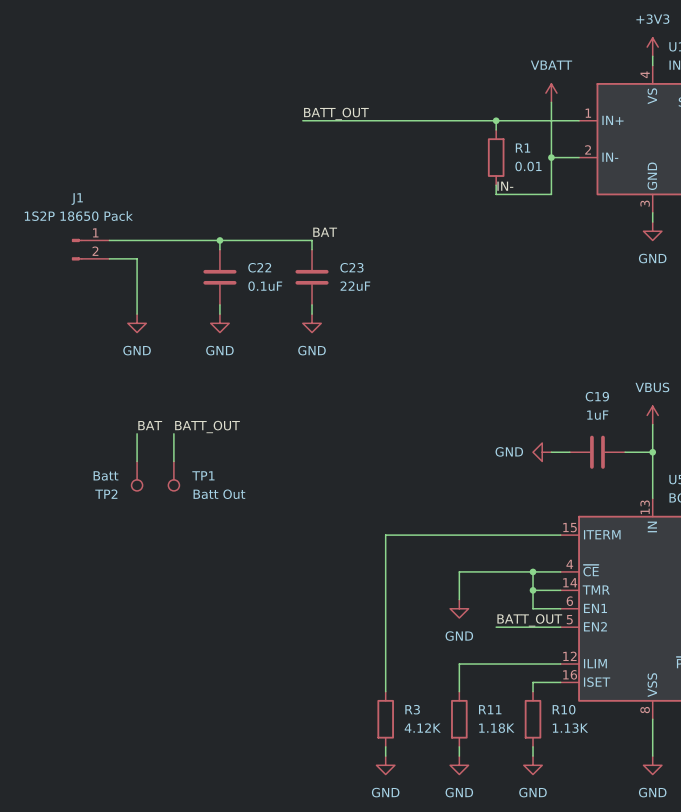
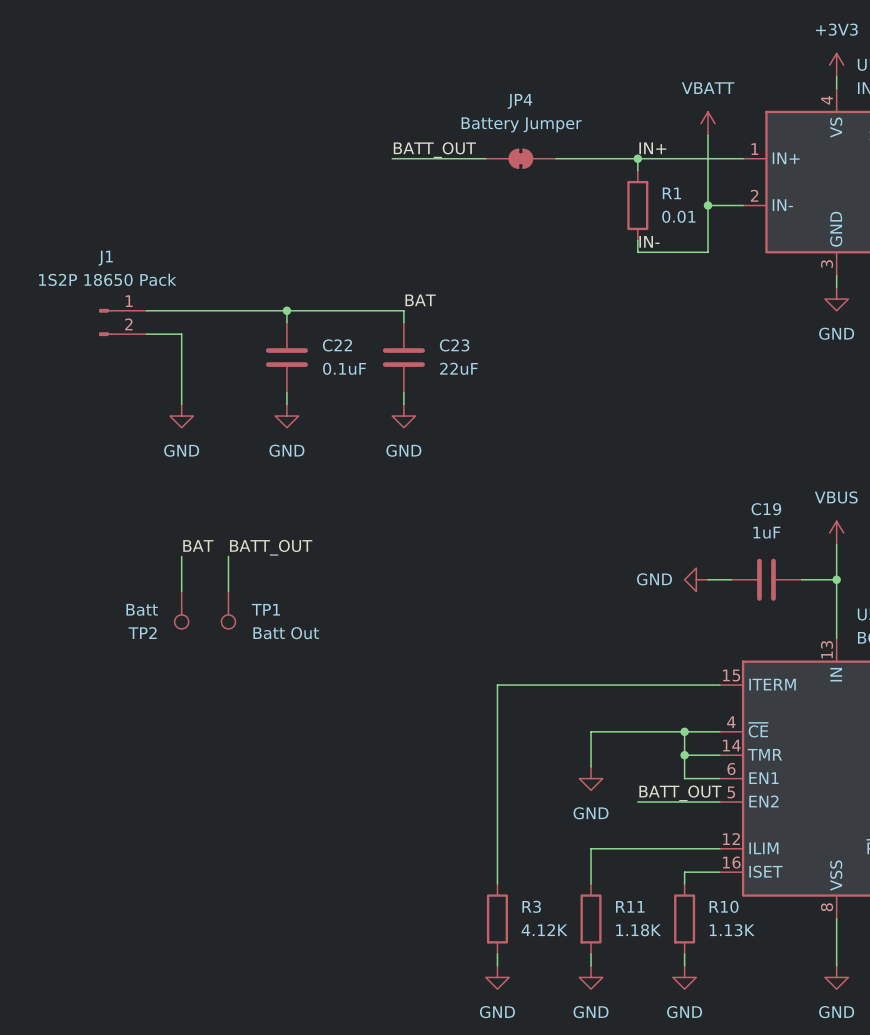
label: none -> IN+ (652, 148)
JP4: none -> Battery Jumper (520, 158)

